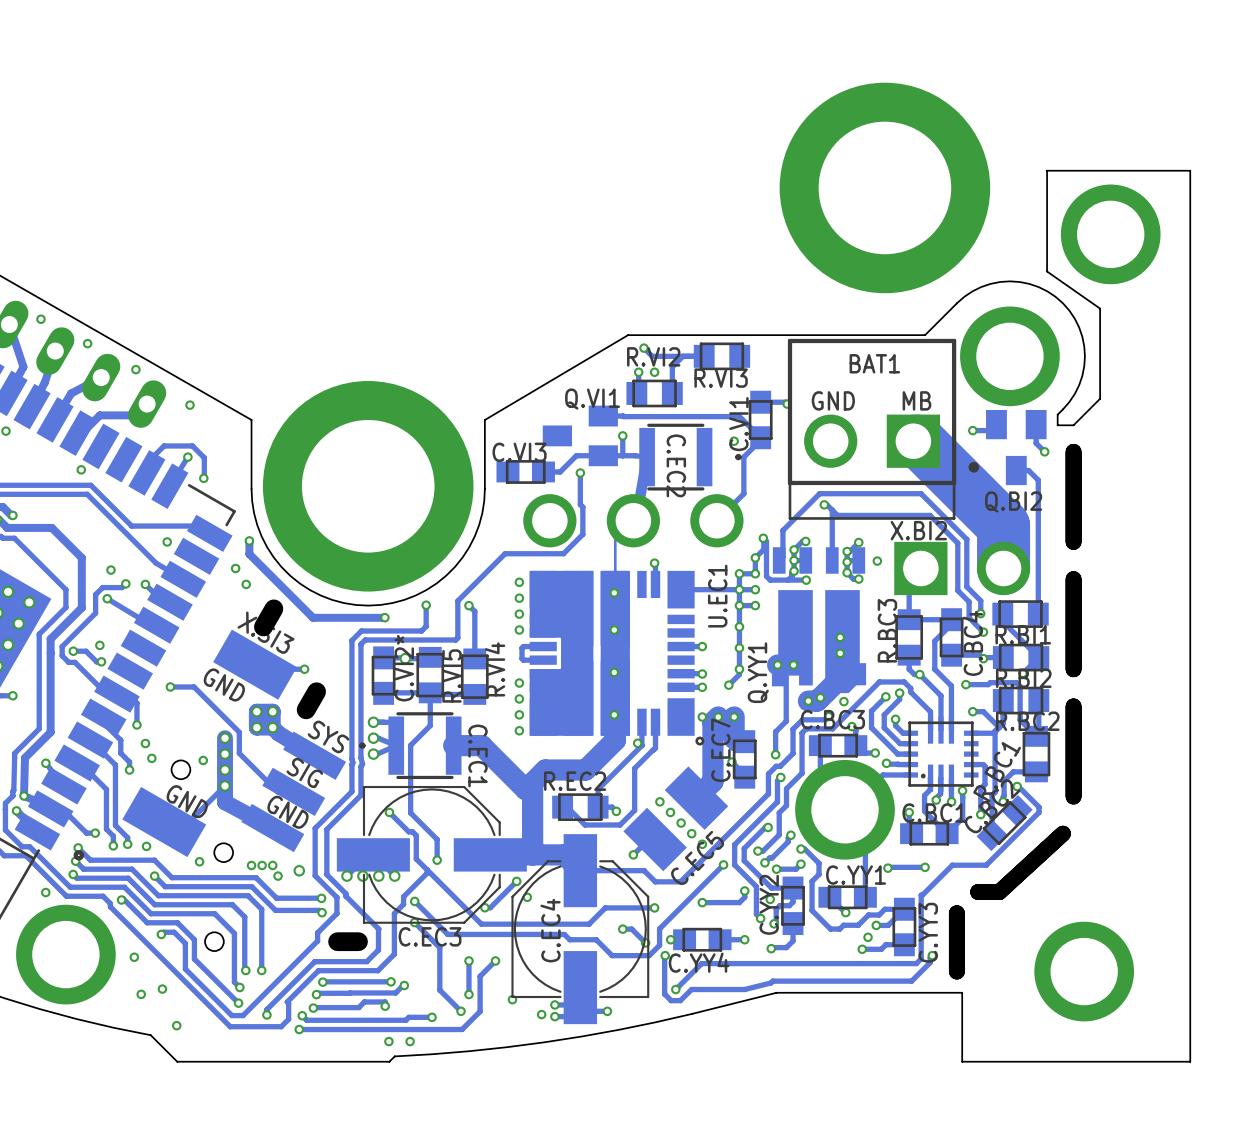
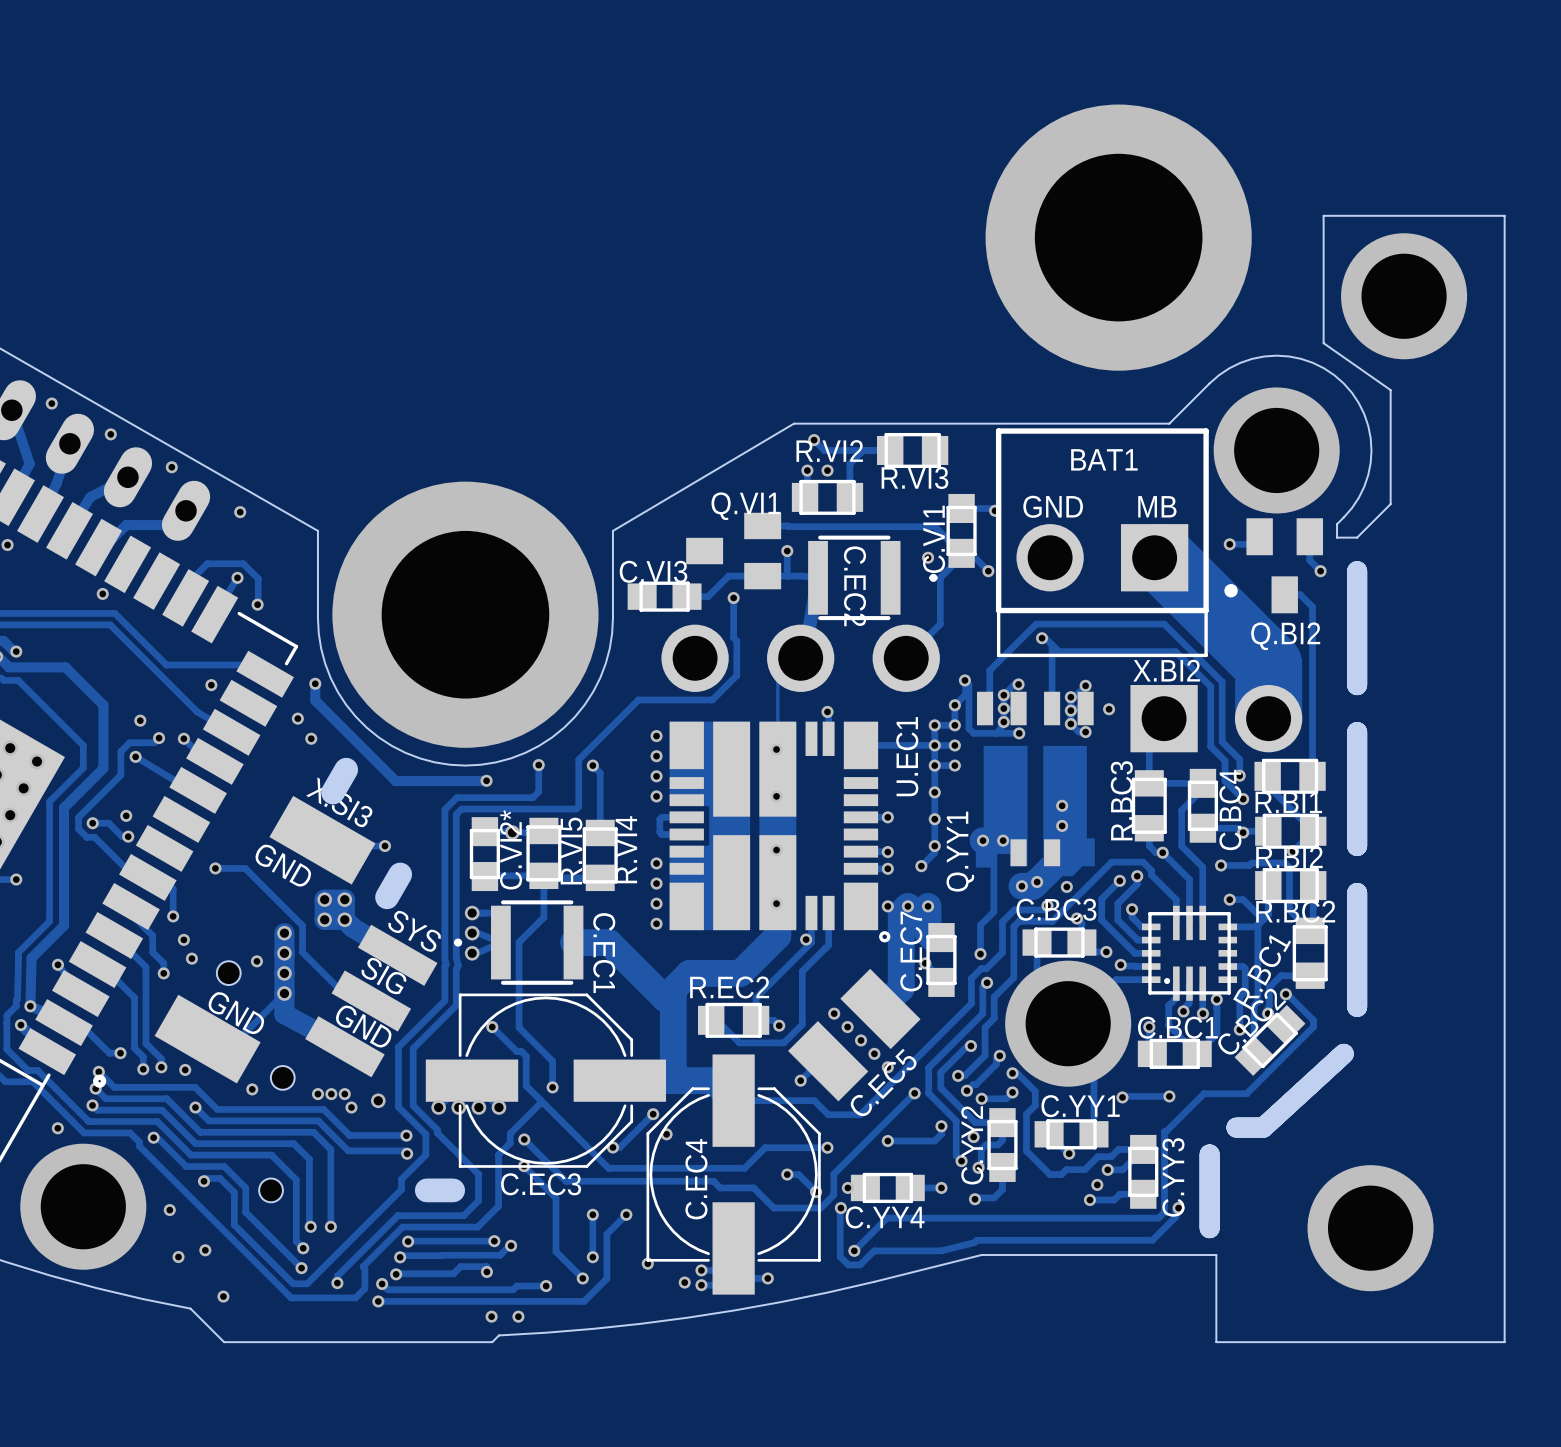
track: none -> (970, 553) (988, 571)
via: none -> (988, 571)

